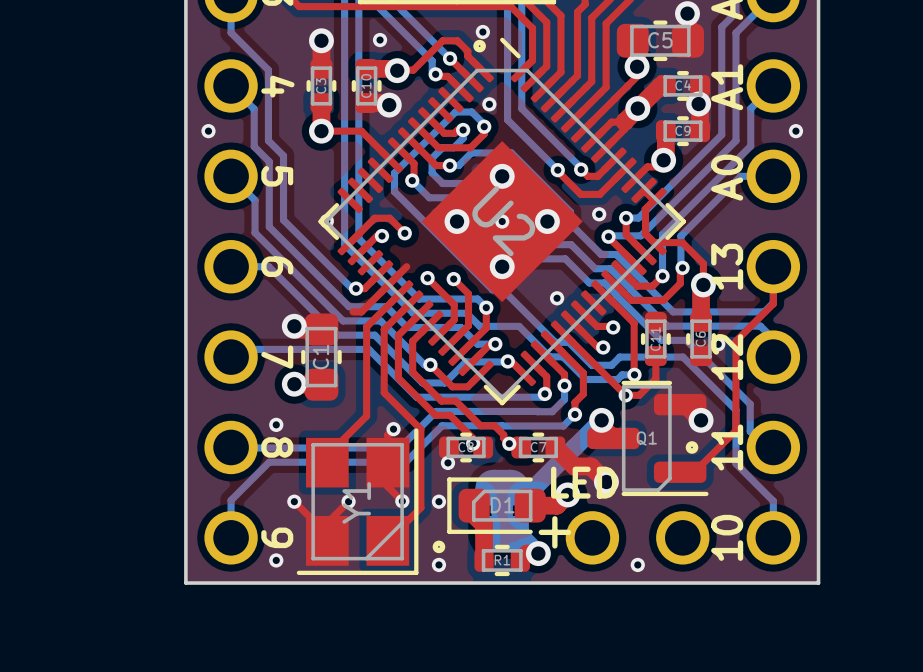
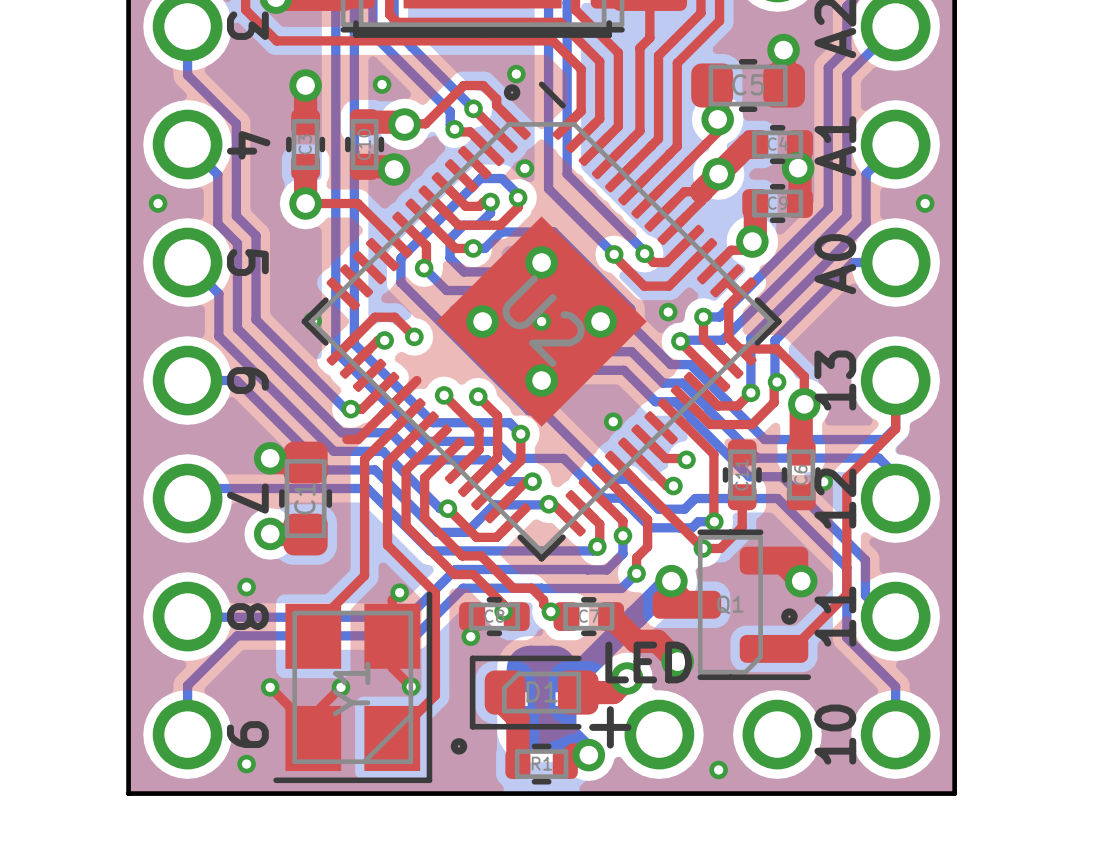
via: (438, 501) -> none
via: (438, 564) -> none

